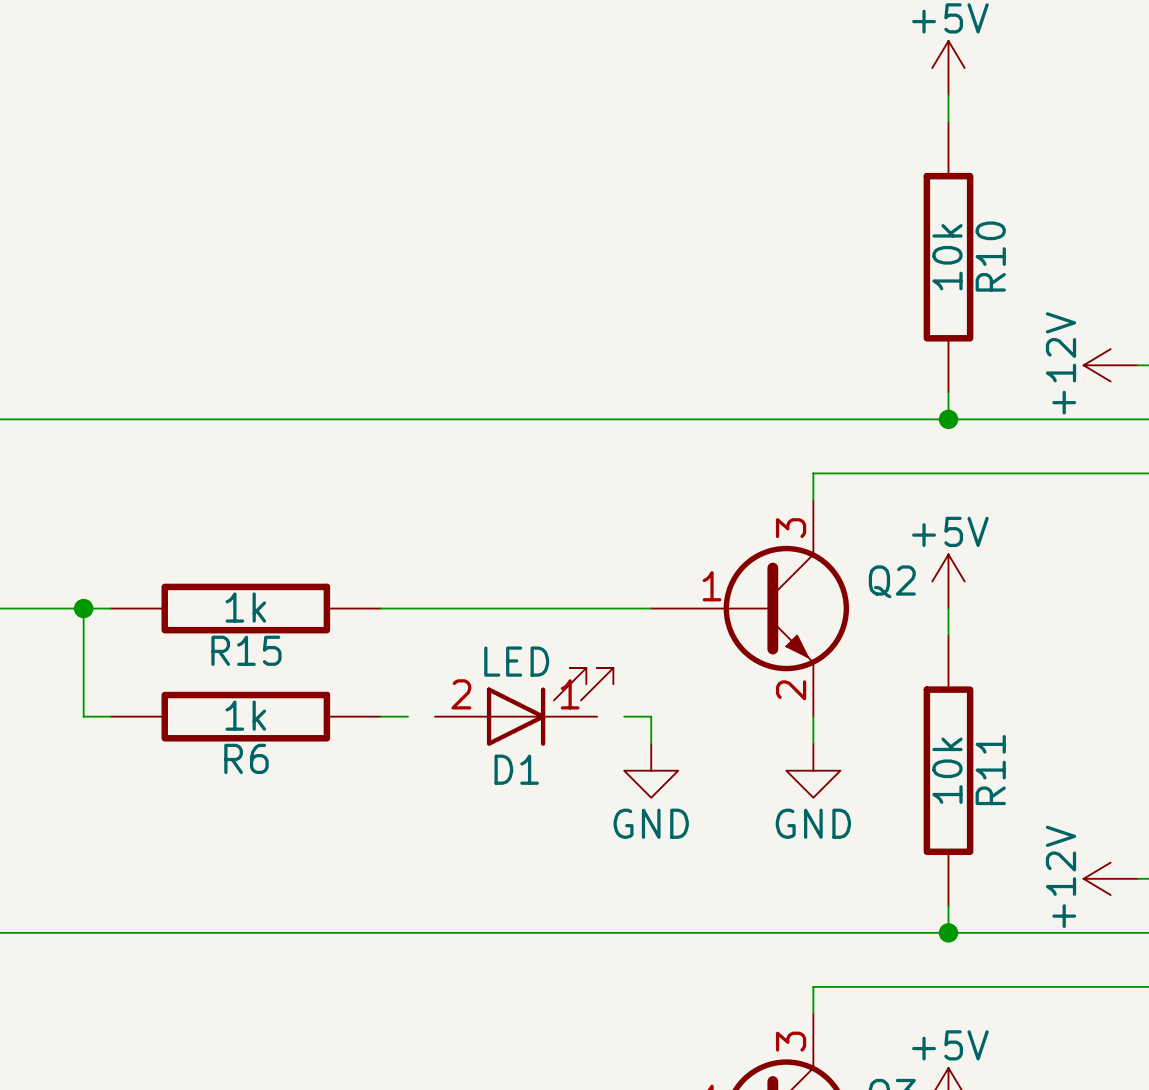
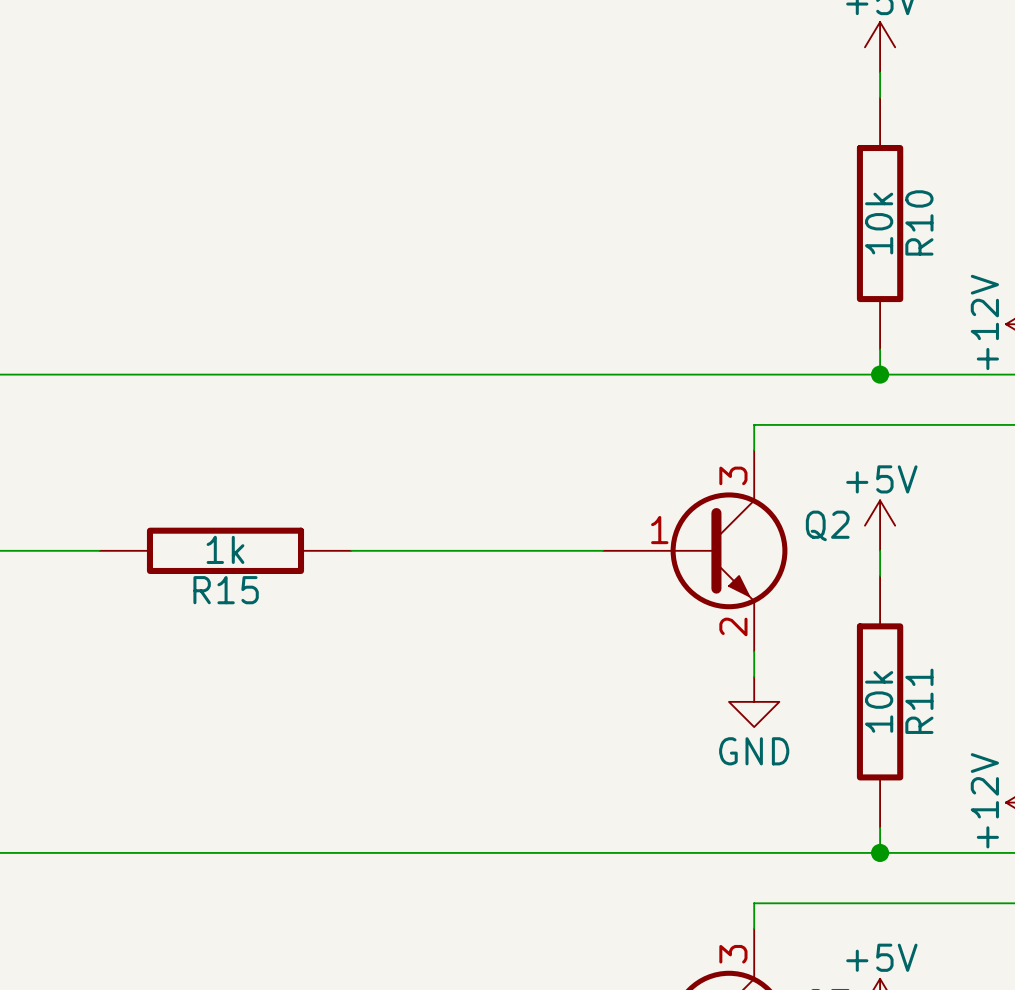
wire: (83, 608) (83, 716) (110, 716) -> none
junction: (83, 608) -> none
D1: LED (524, 706) -> none
R6: 1k (245, 716) -> none
wire: (380, 716) (407, 716) -> none
wire: (624, 716) (651, 716) (651, 743) -> none
power symbol: GND (651, 770) -> none

